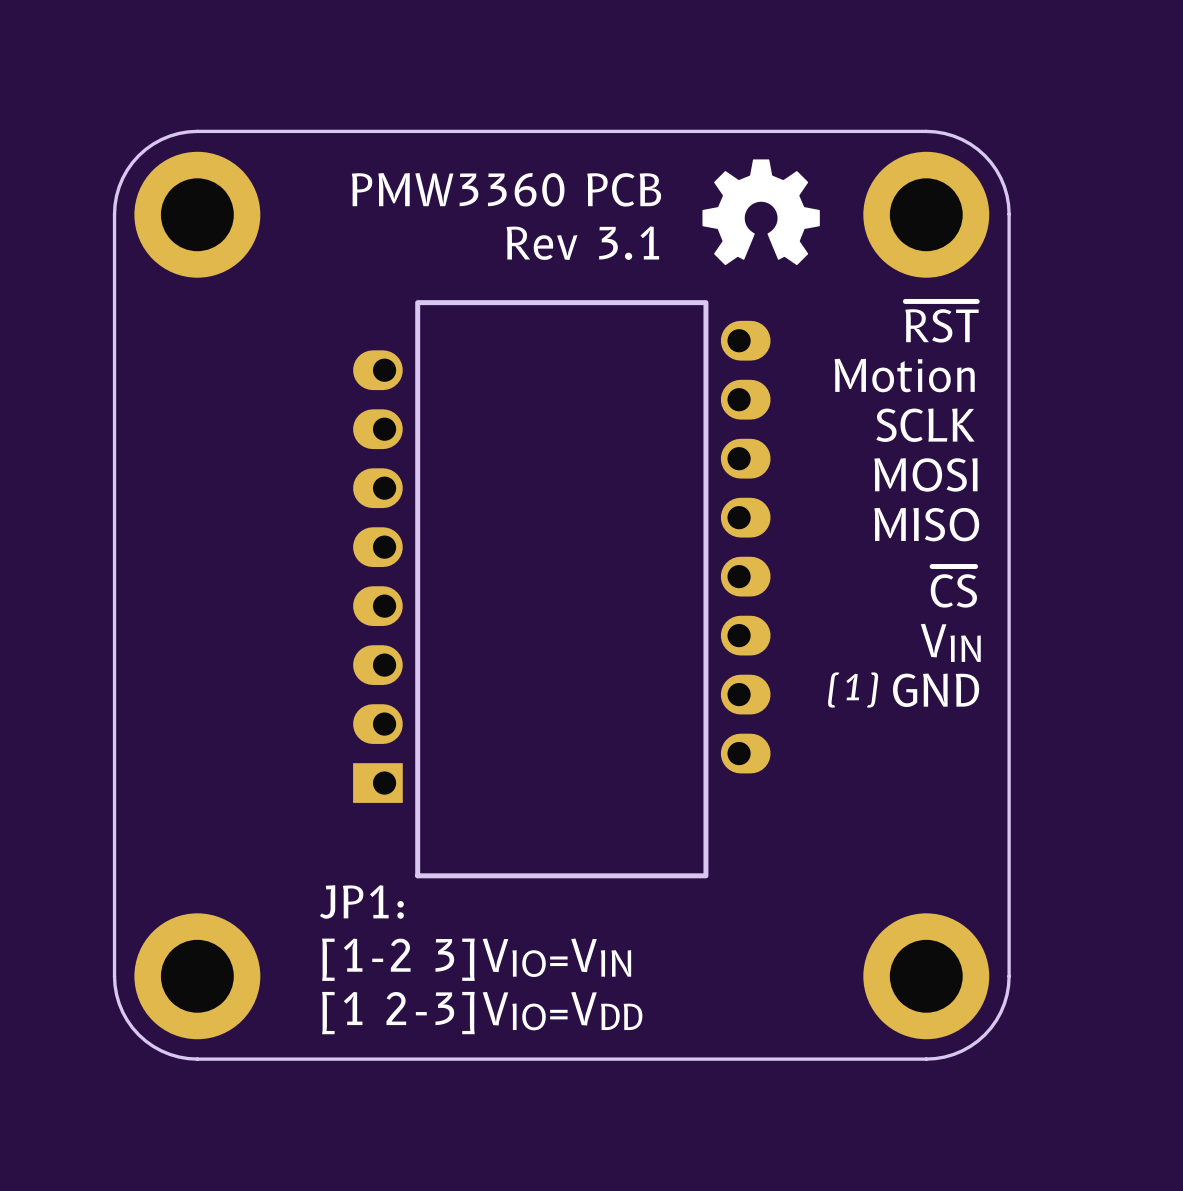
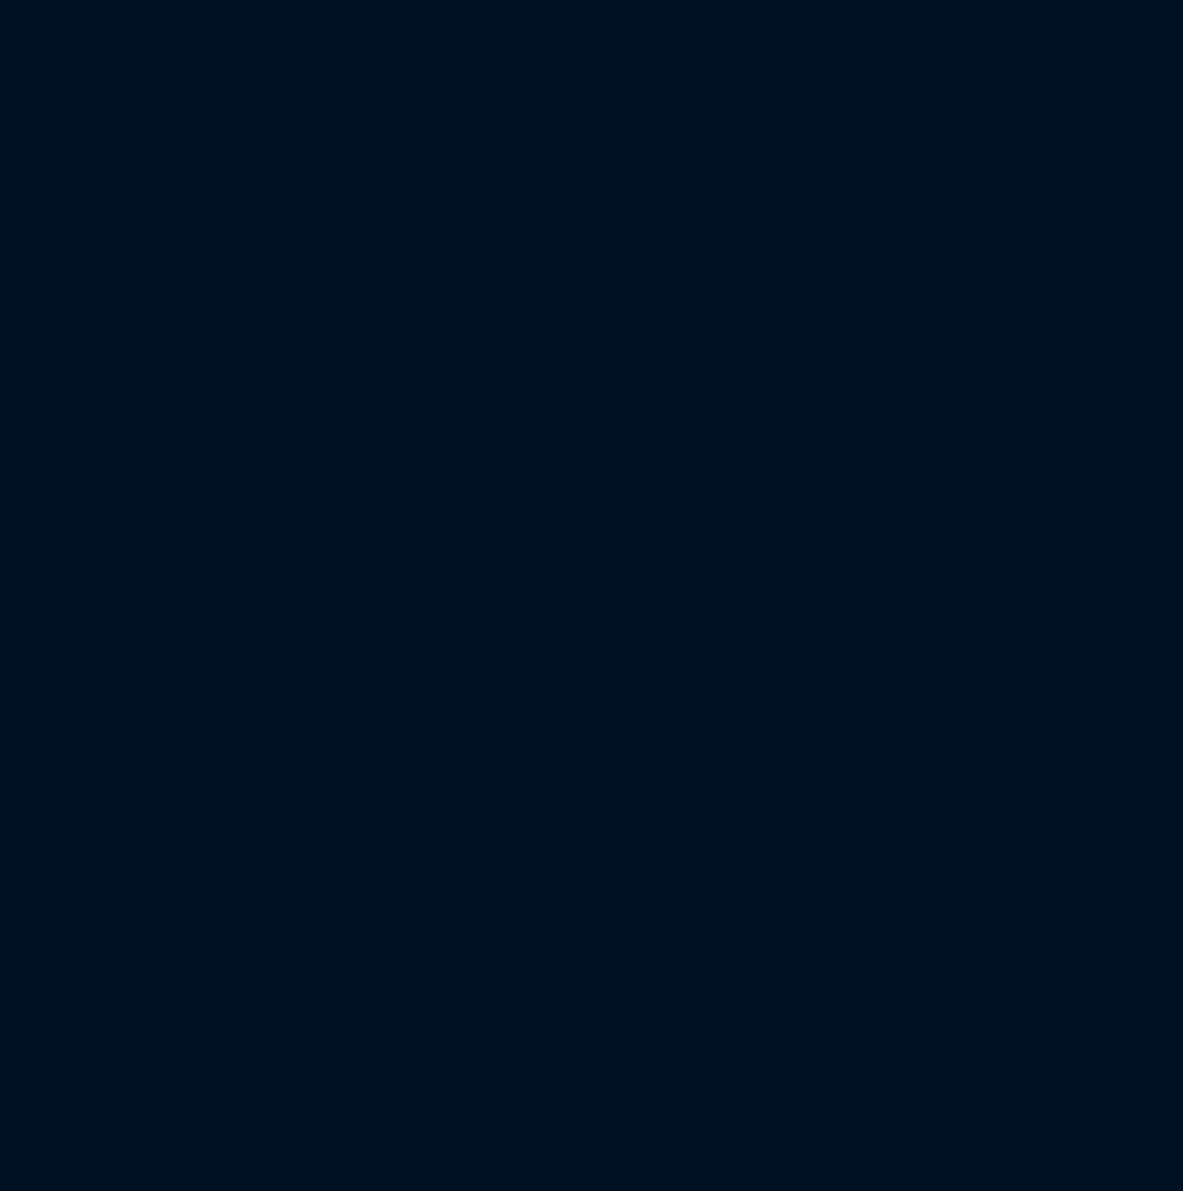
board edge: (926, 131) (197, 131) (178, 133) (161, 139) (145, 149) (132, 162) (119, 186) (114, 214) (114, 976) (116, 994) (122, 1012) (132, 1027) (145, 1041) (170, 1054) (197, 1059) (926, 1059) (944, 1057) (962, 1050) (977, 1041) (991, 1027) (1004, 1003) (1009, 976) (1008, 204) (1000, 178) (984, 155) (962, 139) (944, 133) (926, 131) -> none
drawing: [702, 159, 820, 266] -> none
text: PMW3360 PCB (506, 189) -> none
part: (197, 214) -> none
part: (926, 214) -> none
text: Rev 3.1 (582, 243) -> none
text: ~{RST} (941, 322) -> none
text: Motion (904, 375) -> none
text: SCLK (925, 425) -> none
text: MOSI (925, 474) -> none
text: MISO (926, 524) -> none
text: ~{CS} (953, 587) -> none
part: (561, 589) -> none
text: VIN (950, 642) -> none
text: (1) (853, 689) -> none
text: GND (936, 690) -> none
text: JP1: (361, 902) -> none
text: [1-2 3]VIO=VIN (476, 959) -> none
part: (197, 976) -> none
part: (926, 976) -> none
text: [1 2-3]VIO=VDD (482, 1013) -> none

